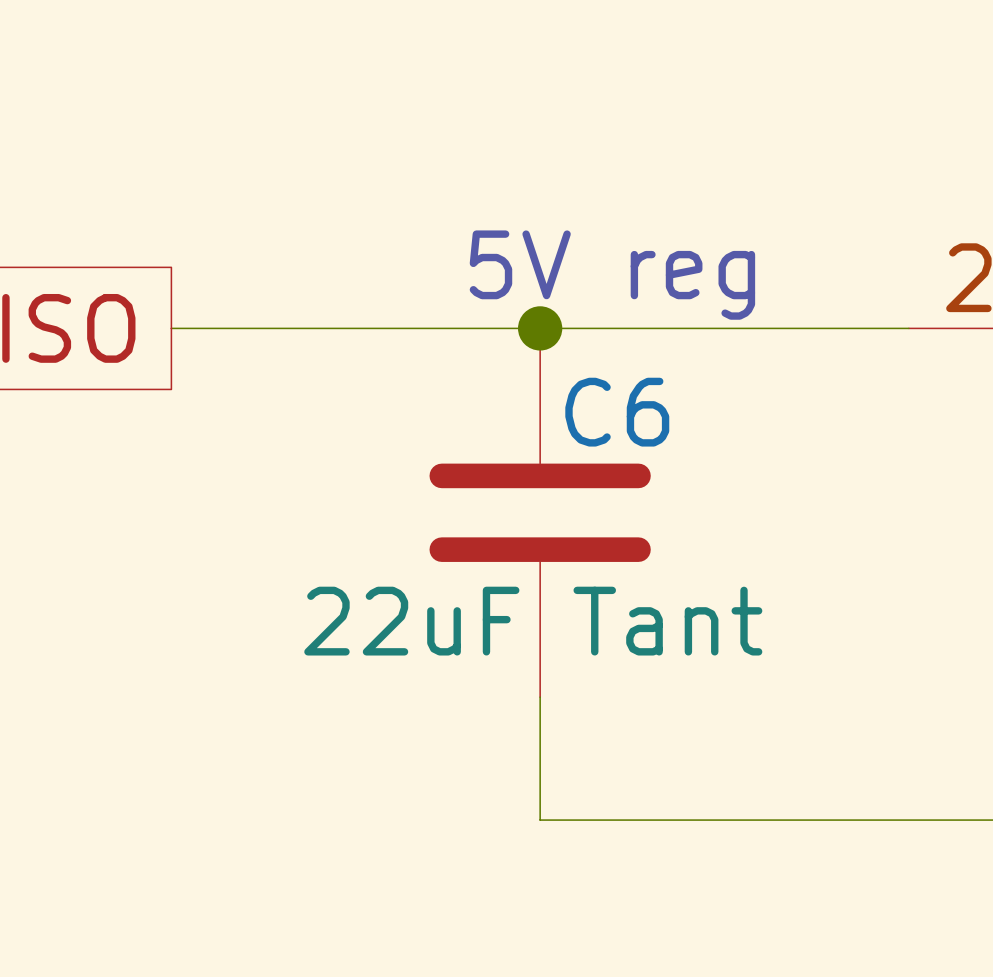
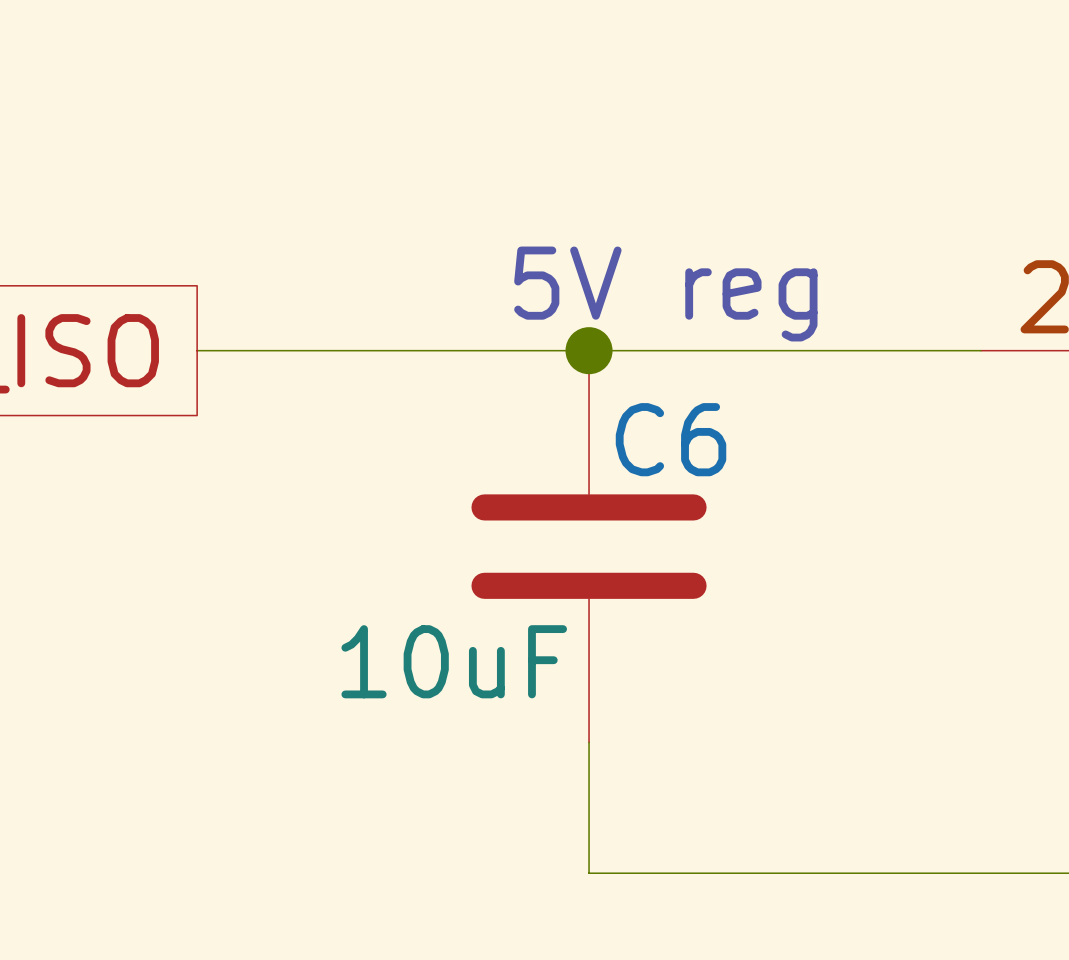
C6 value: 22uF Tant (533, 621) -> 10uF (454, 661)

